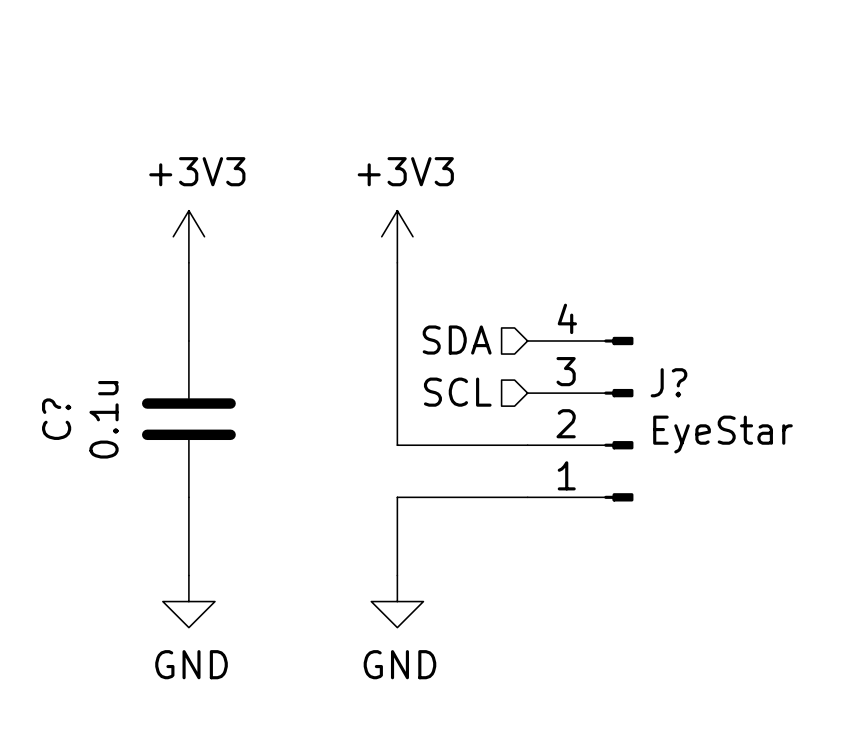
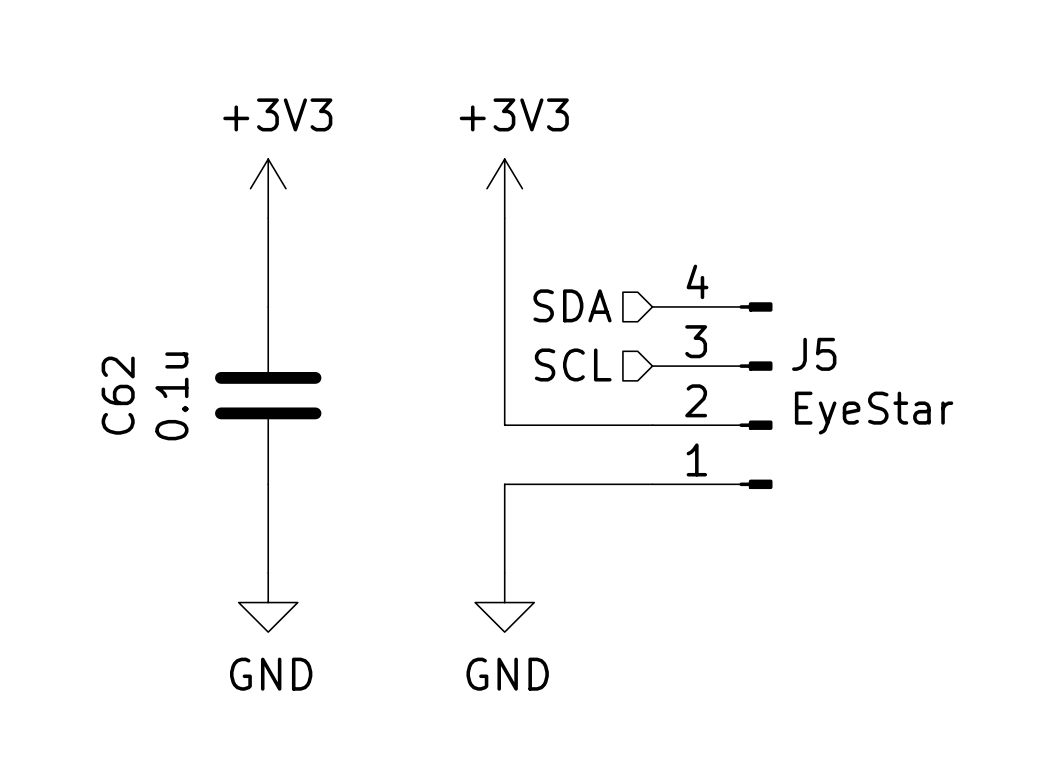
J? name: J? (669, 382) -> J5 (814, 354)
C? name: C? (56, 419) -> C62 (118, 395)

